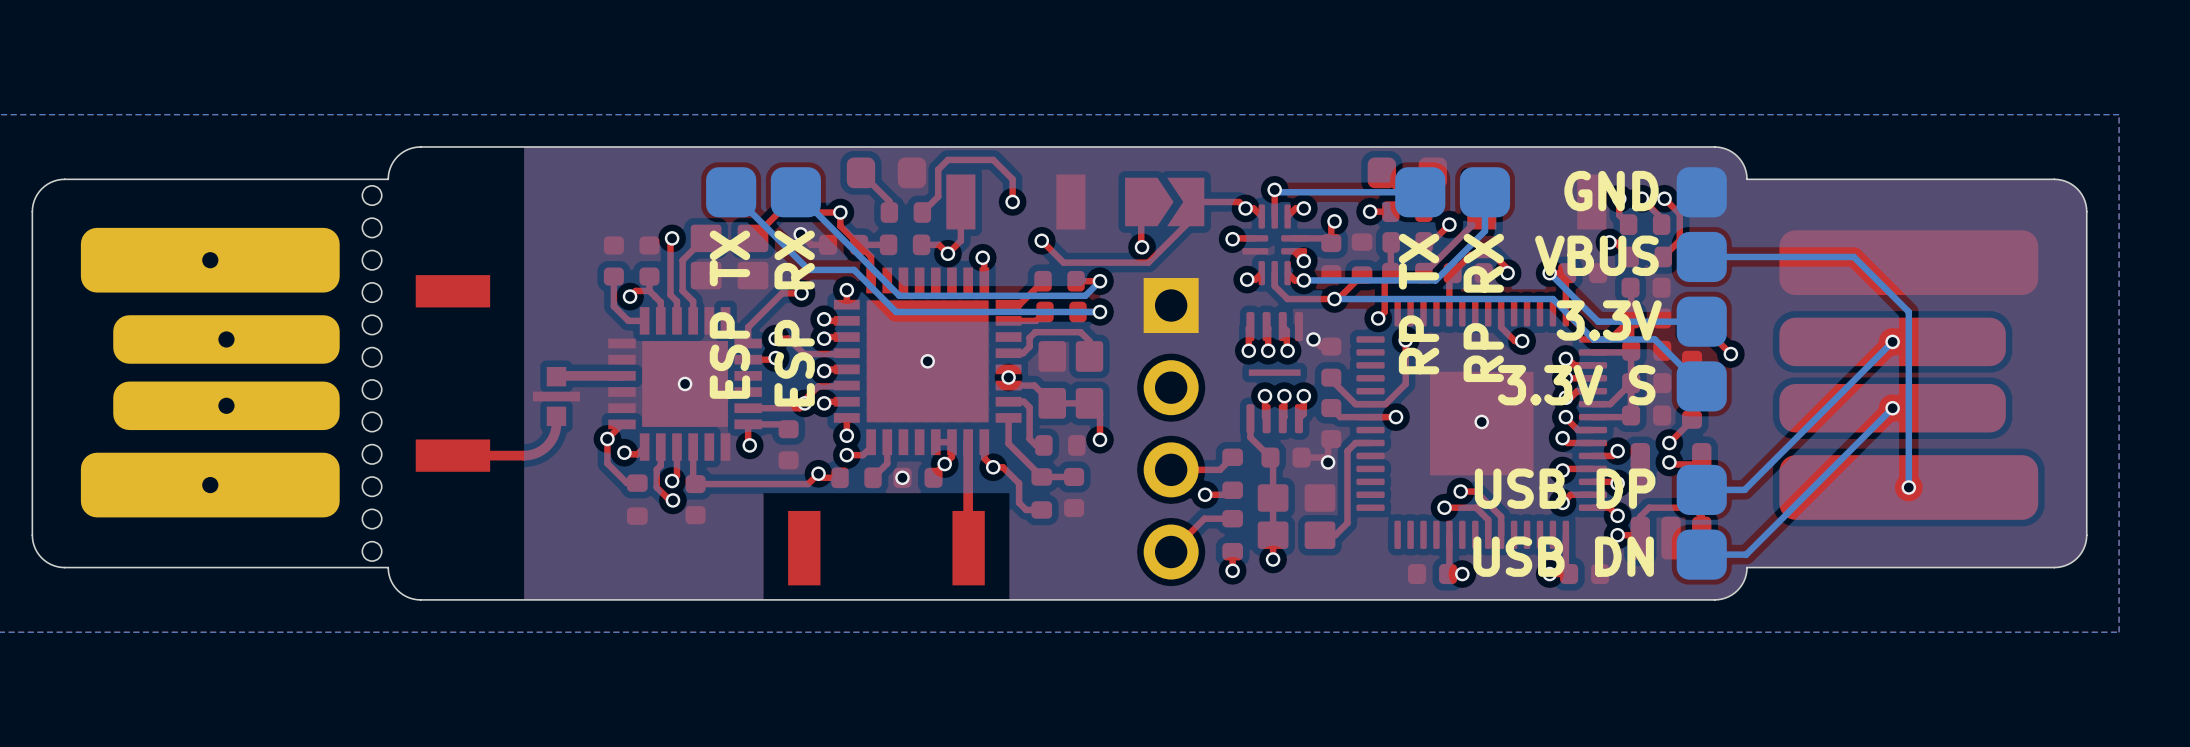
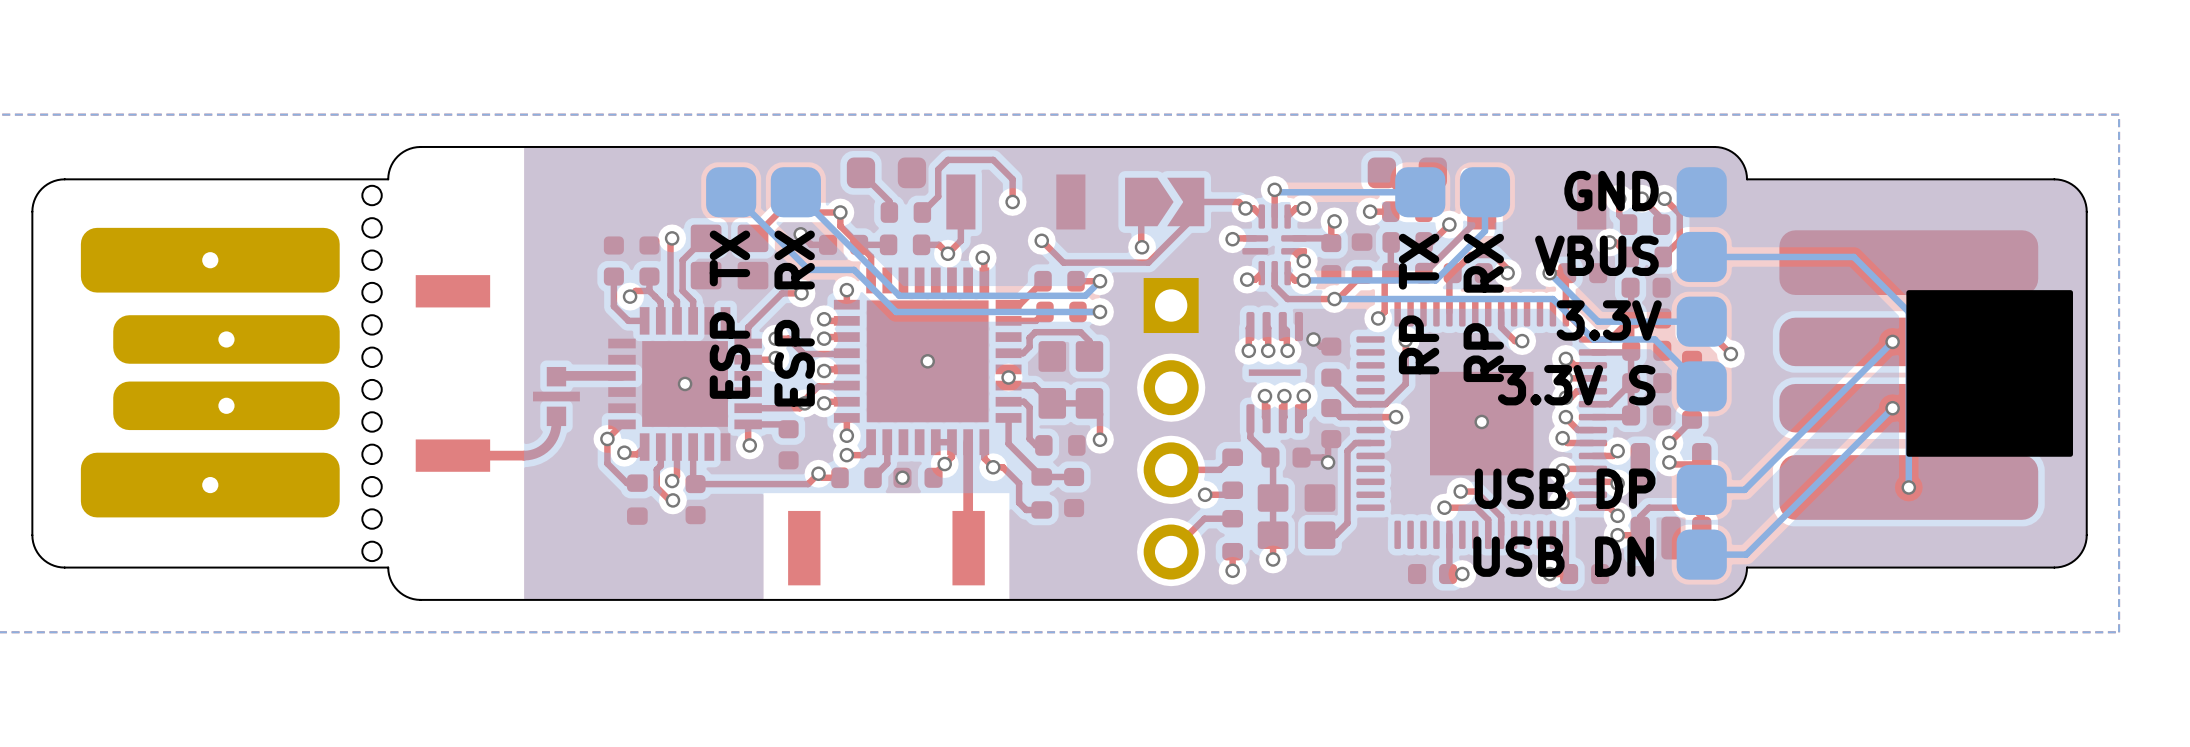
drawing: none -> [1906, 290, 2073, 457]

